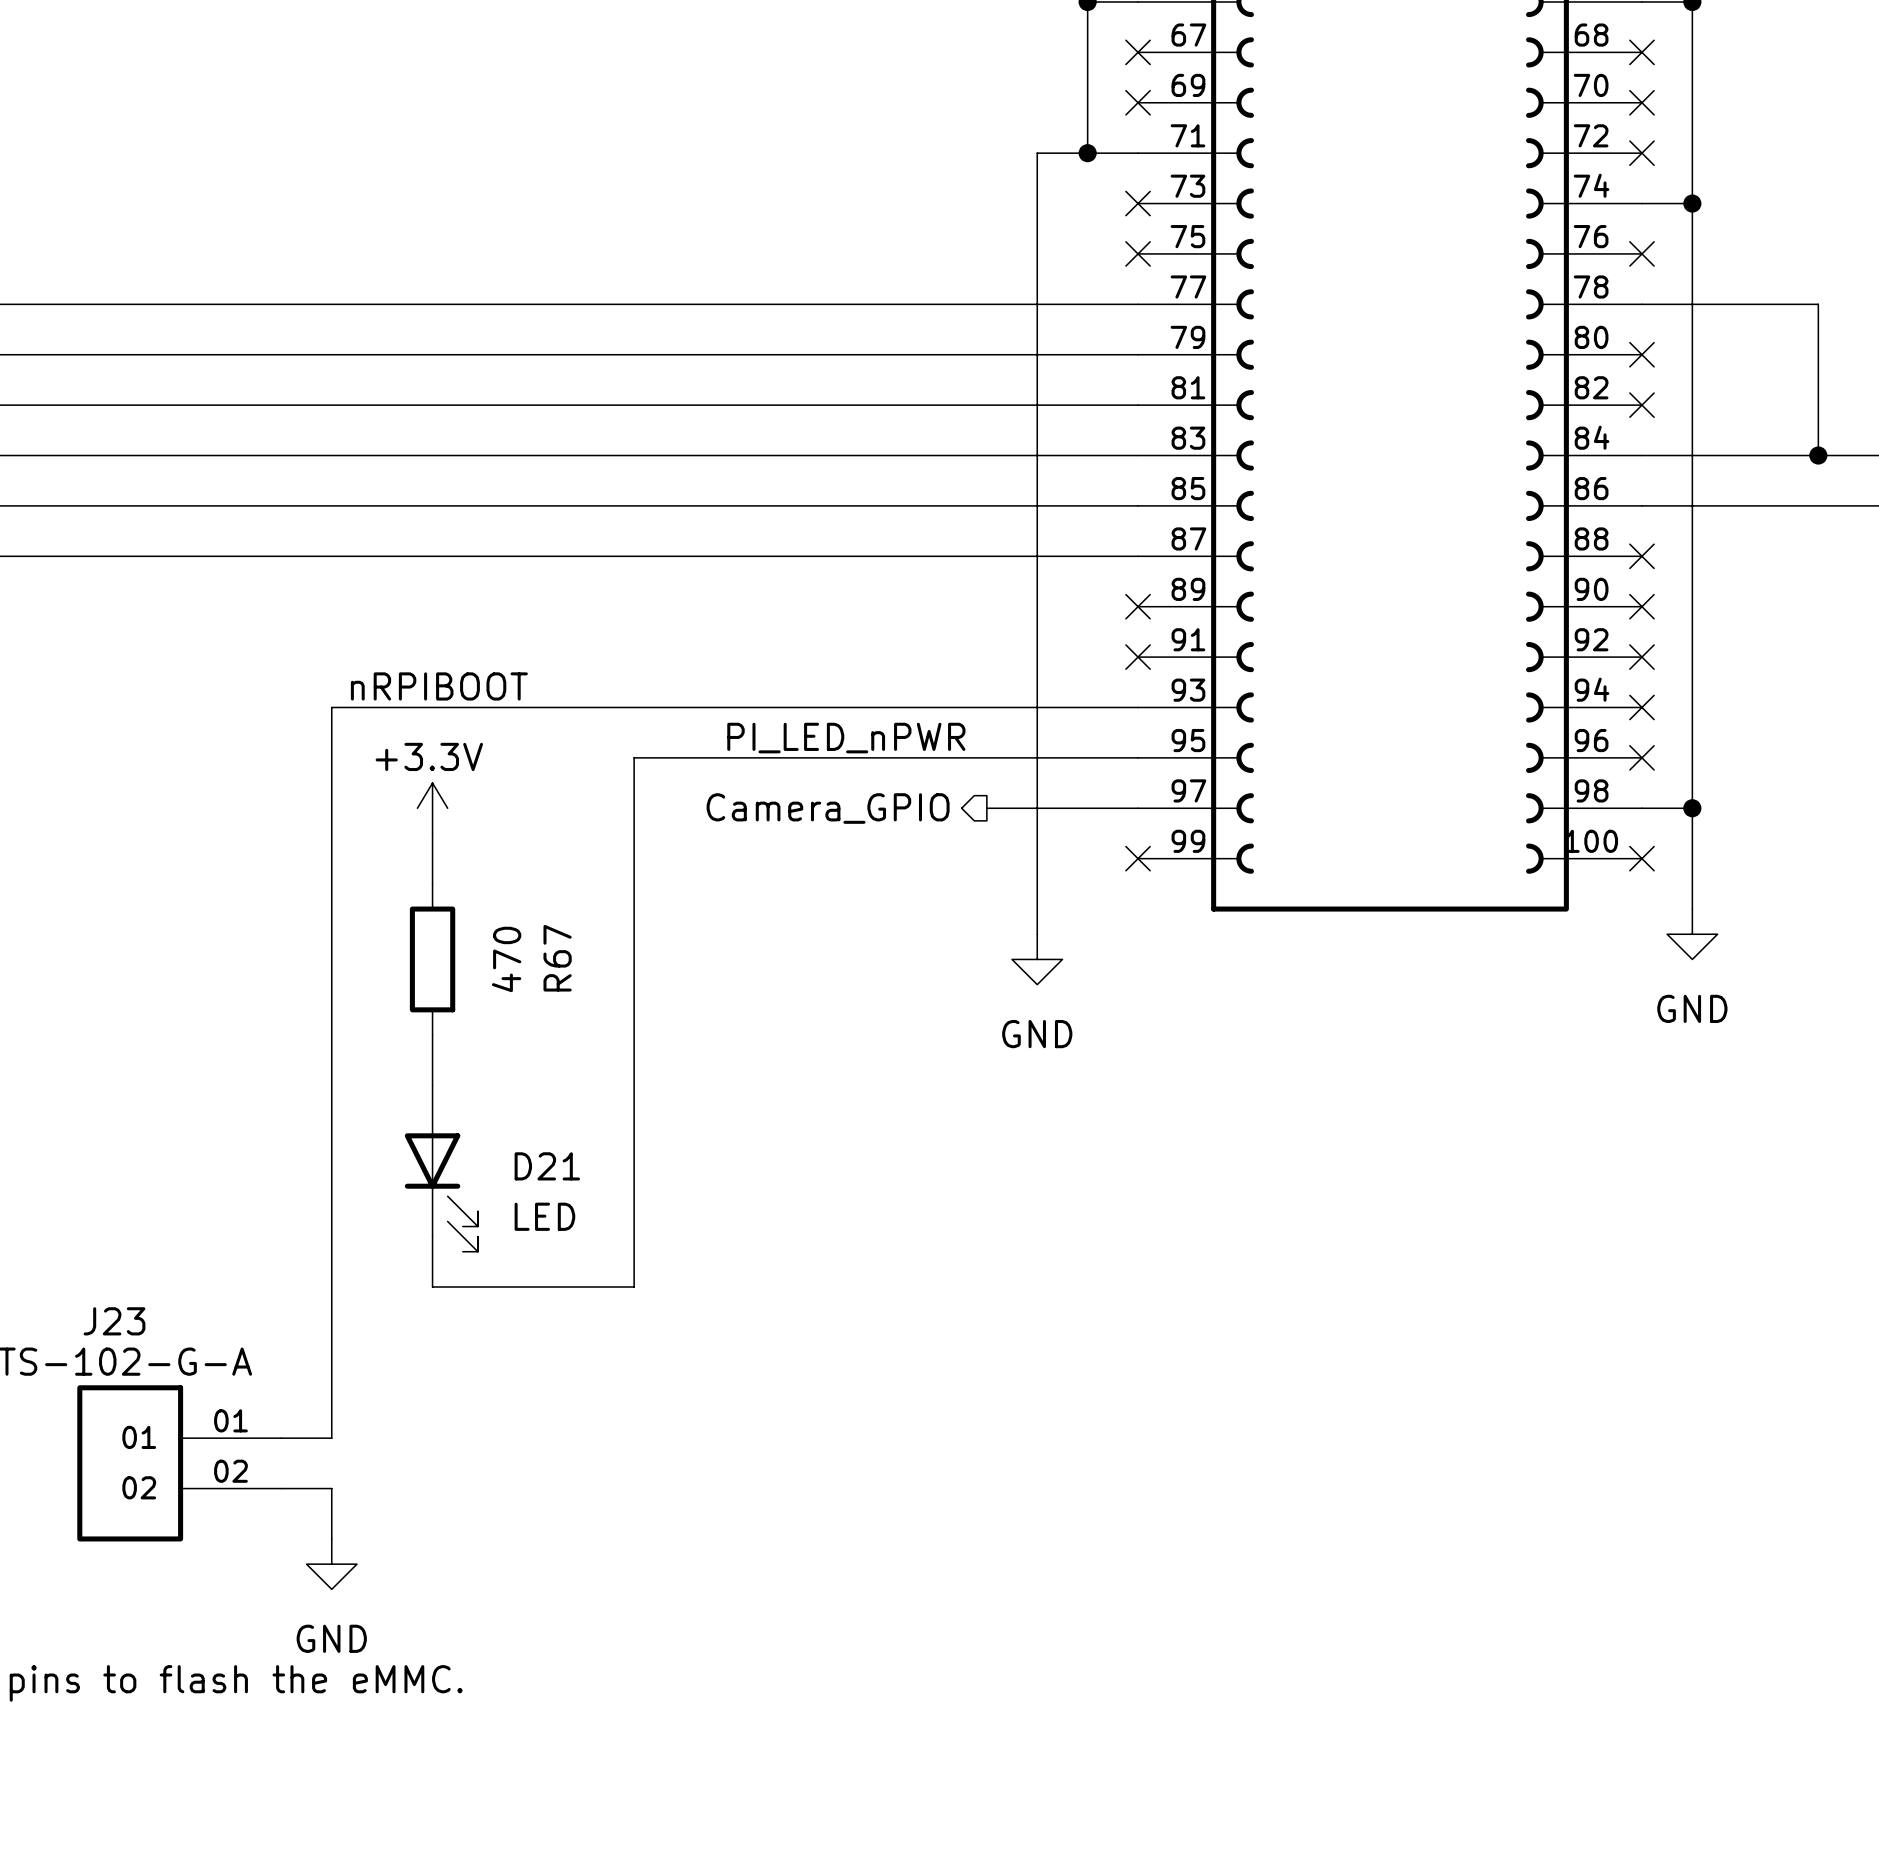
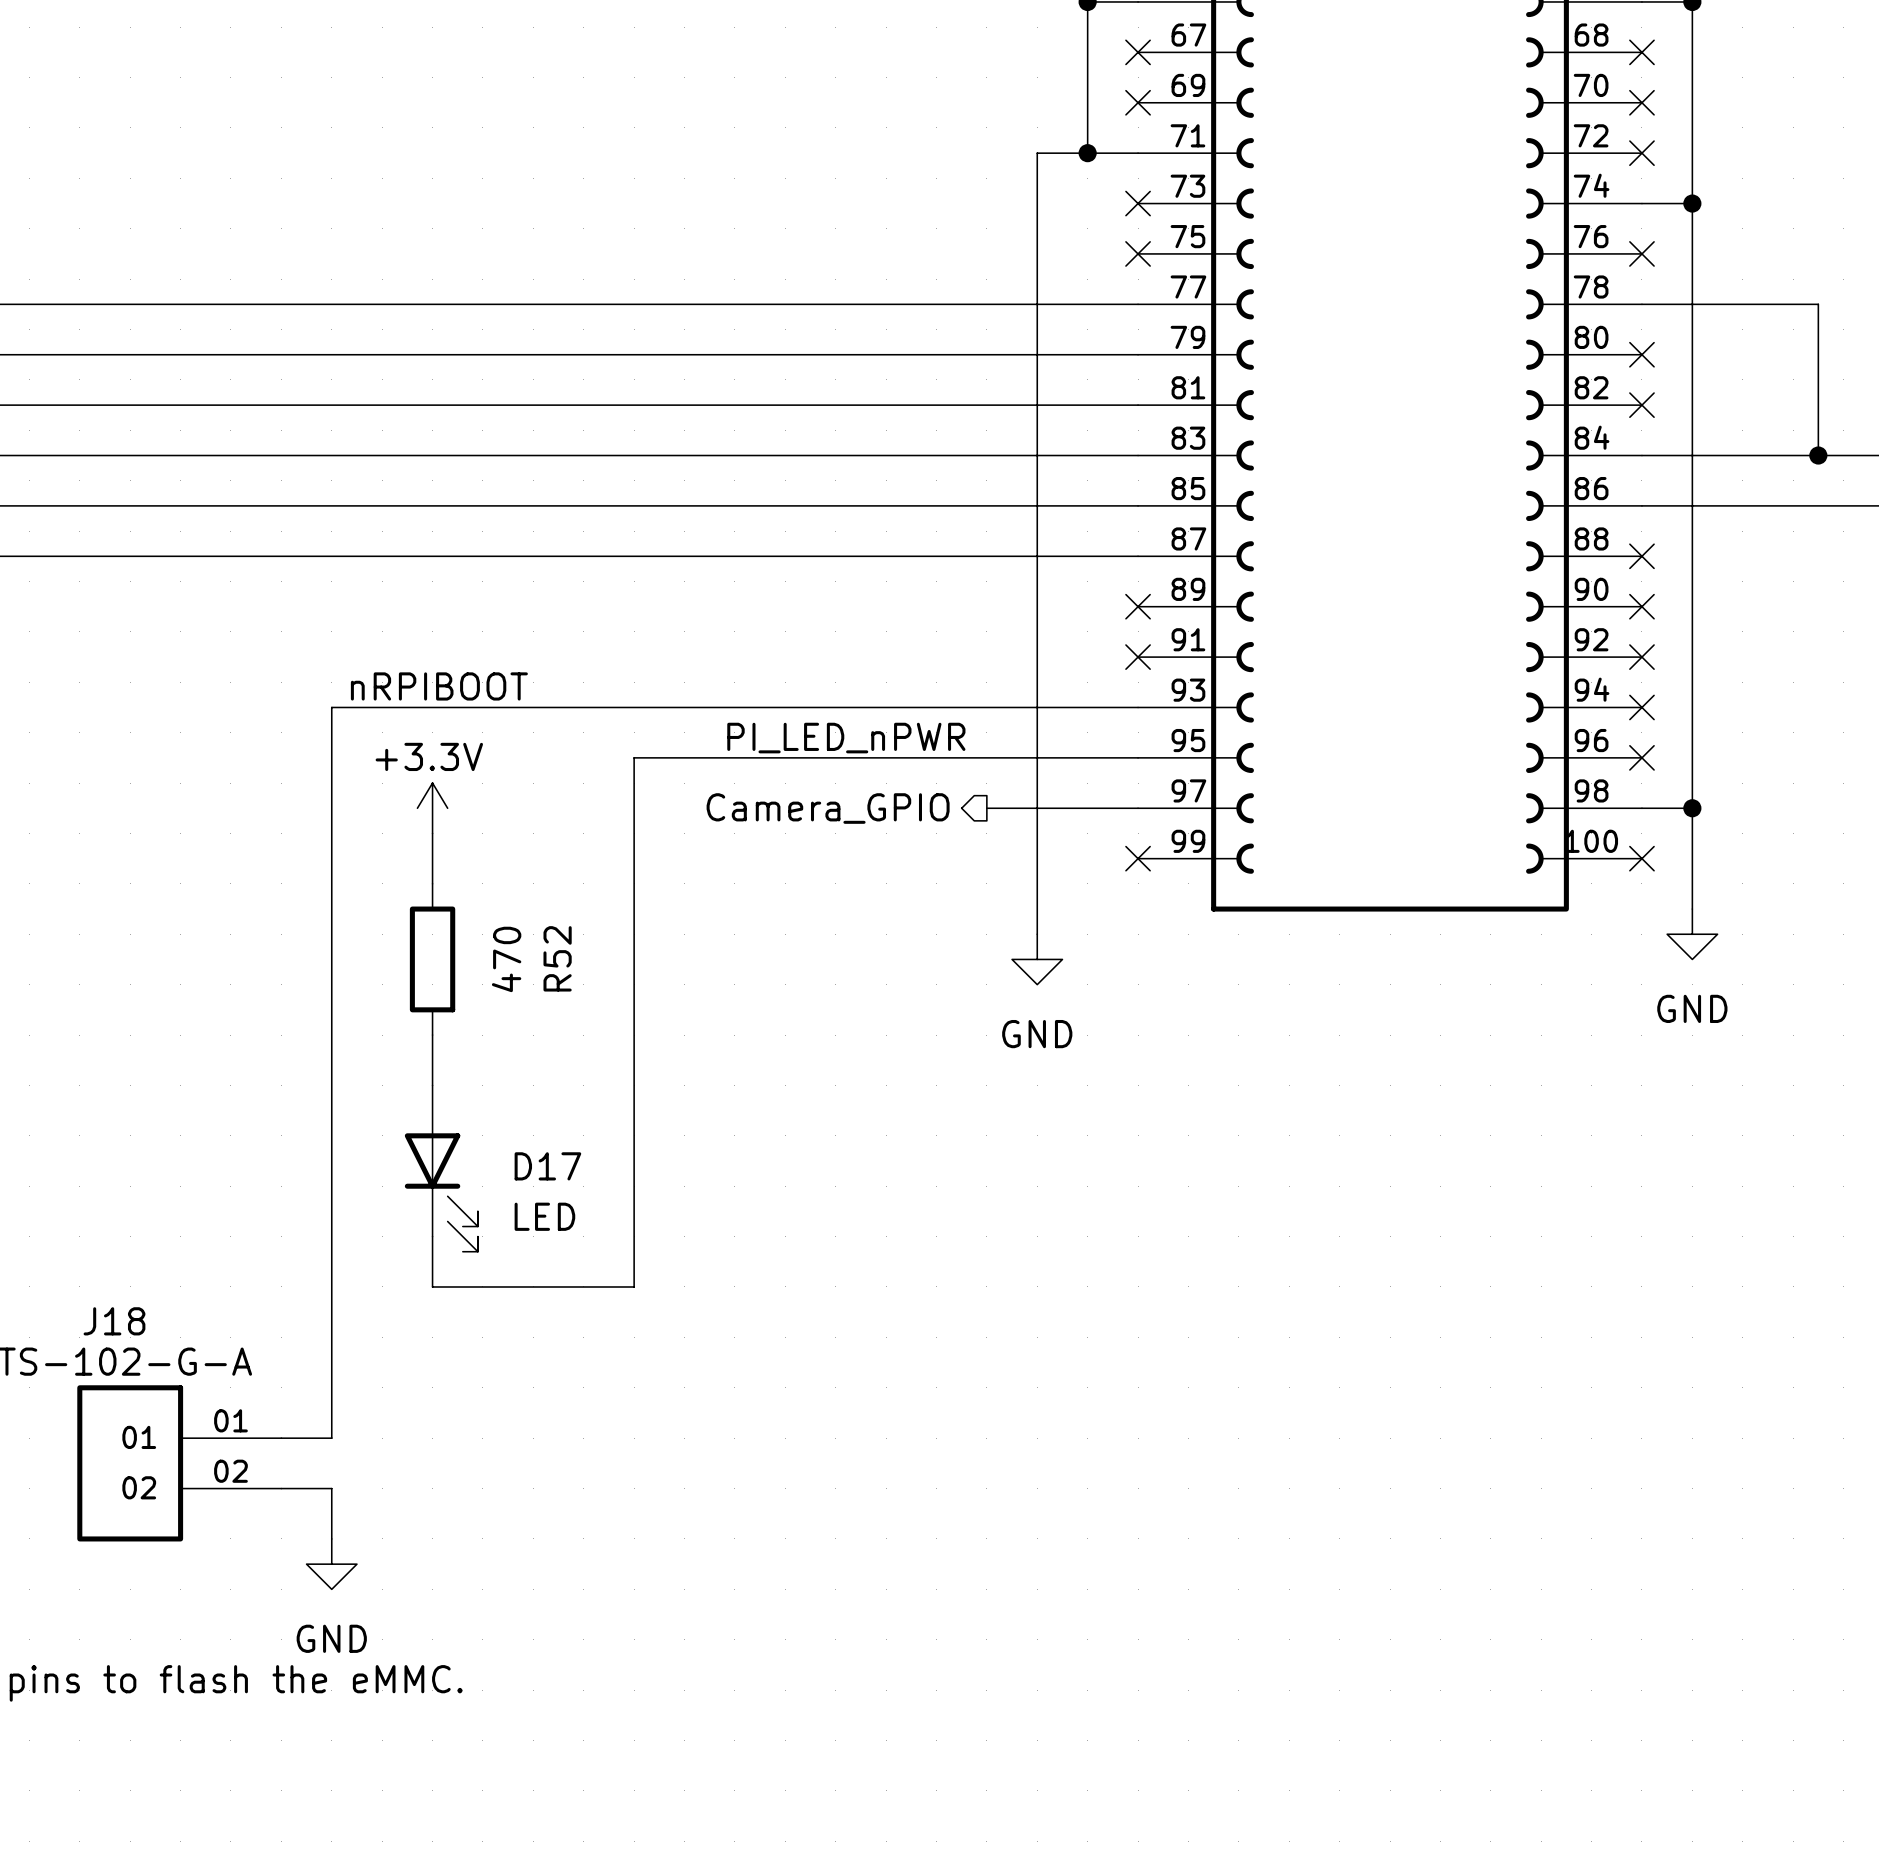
R67 name: R67 (557, 958) -> R52 (557, 958)
D21 name: D21 (547, 1166) -> D17 (547, 1166)
J23 name: J23 (114, 1321) -> J18 (114, 1321)

